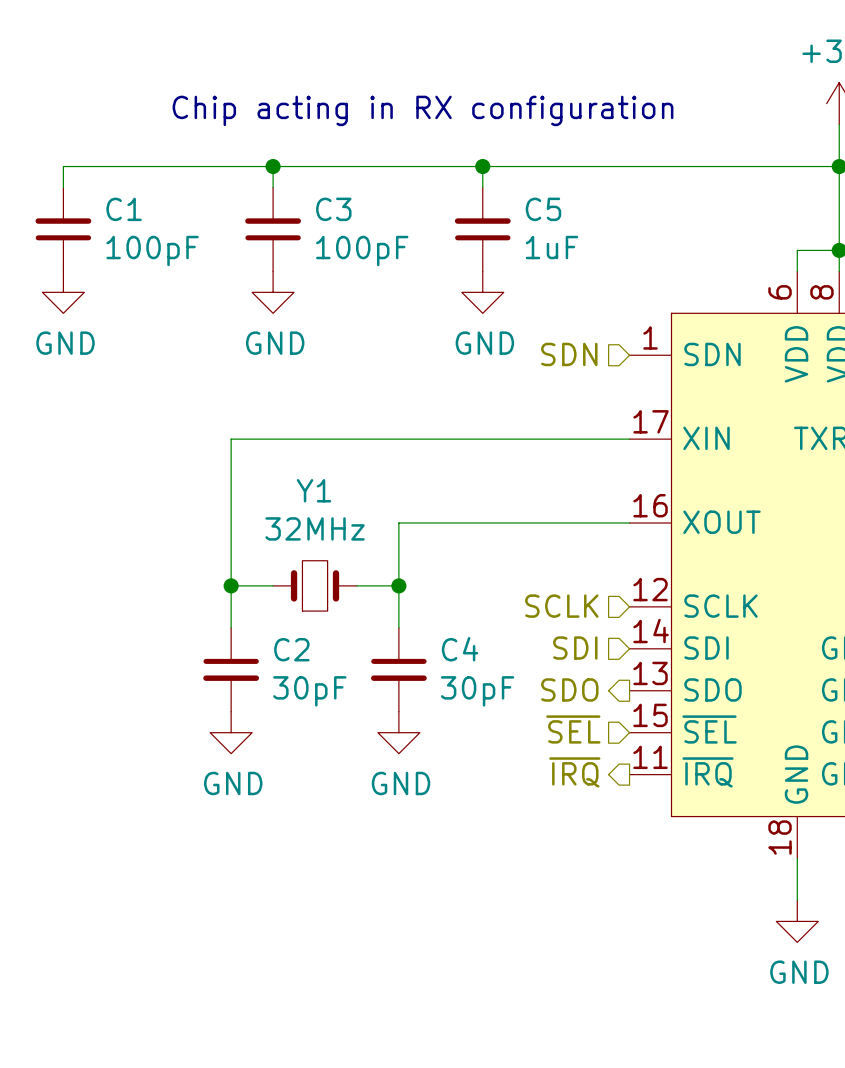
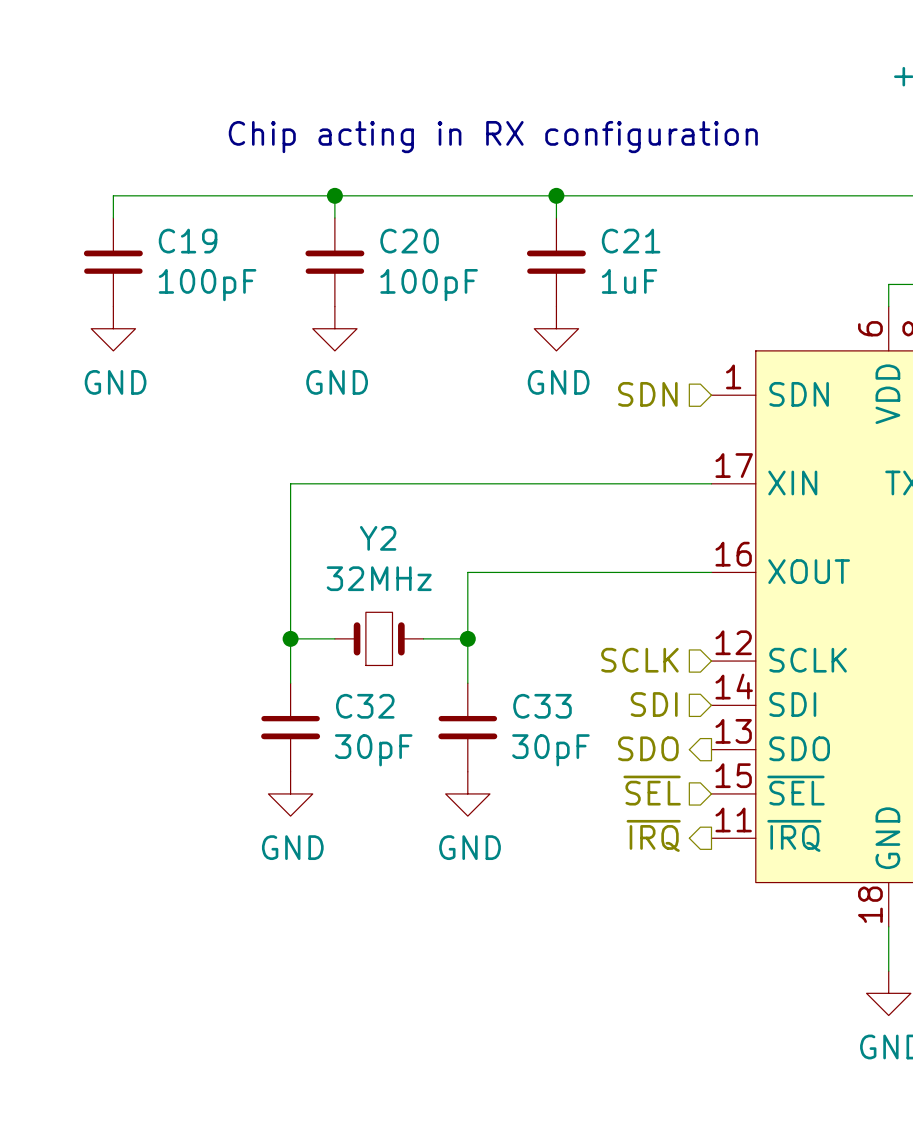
C1 name: C1 (124, 209) -> C19 (188, 241)
C3 name: C3 (333, 209) -> C20 (409, 241)
C5 name: C5 (543, 209) -> C21 (631, 241)
Y1 name: Y1 (314, 490) -> Y2 (378, 538)
C2 name: C2 (291, 649) -> C32 (365, 706)
C4 name: C4 (460, 649) -> C33 (542, 706)

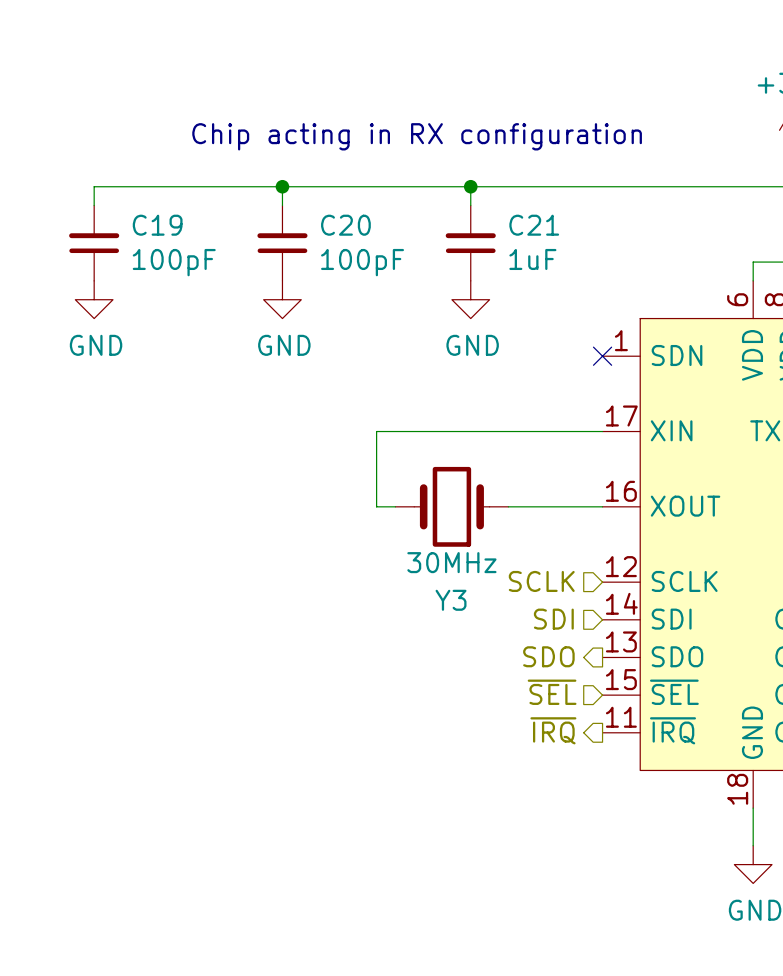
hierarchical label: SDN (647, 394) -> none
no-connect mark: none -> (602, 356)
wire: (445, 483) (290, 483) (290, 683) -> (376, 431) (376, 506) (395, 506)
Y3: none -> 30MHz (451, 506)
wire: (600, 572) (467, 572) (467, 683) -> none
wire: (290, 638) (334, 638) -> none
junction: (290, 638) -> none
Y2: 32MHz (379, 638) -> none
wire: (423, 638) (467, 638) -> none
junction: (467, 638) -> none
C32: 30pF (290, 727) -> none
C33: 30pF (467, 727) -> none
power symbol: GND (290, 793) -> none
power symbol: GND (467, 793) -> none

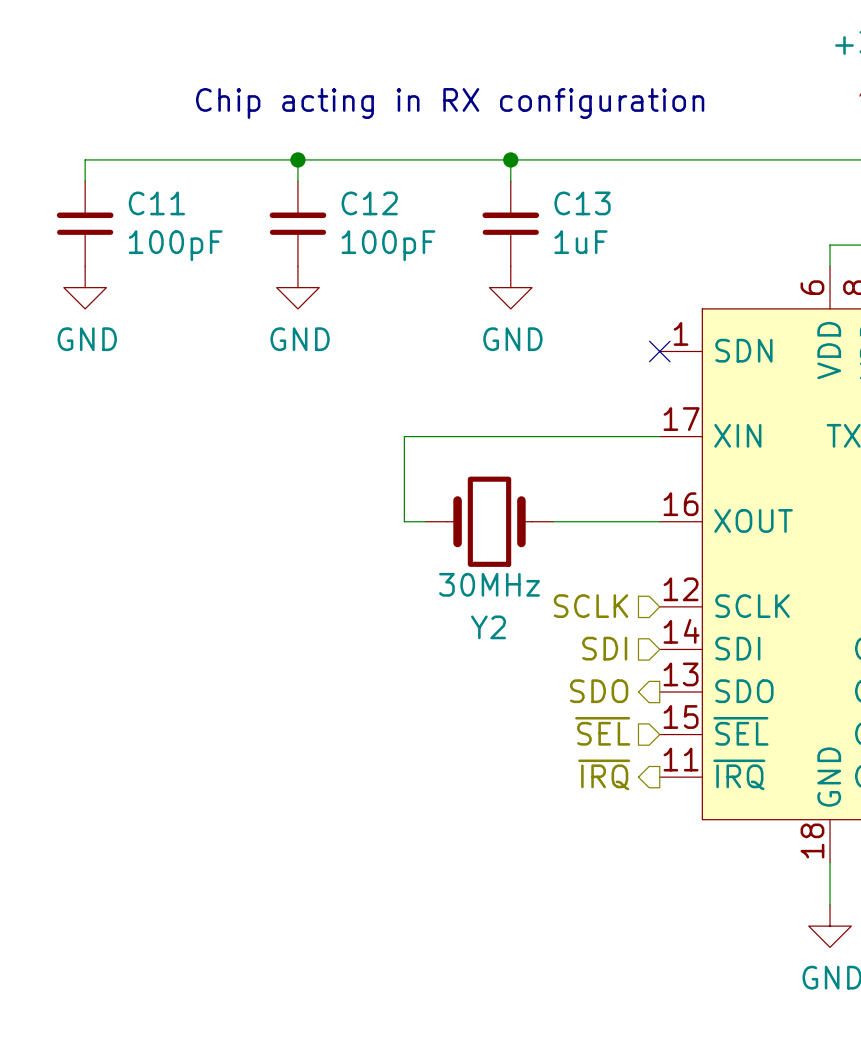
C19 name: C19 (157, 225) -> C11 (156, 203)
C20 name: C20 (345, 225) -> C12 (369, 203)
C21 name: C21 (534, 225) -> C13 (582, 203)
Y3 name: Y3 (451, 600) -> Y2 (488, 627)

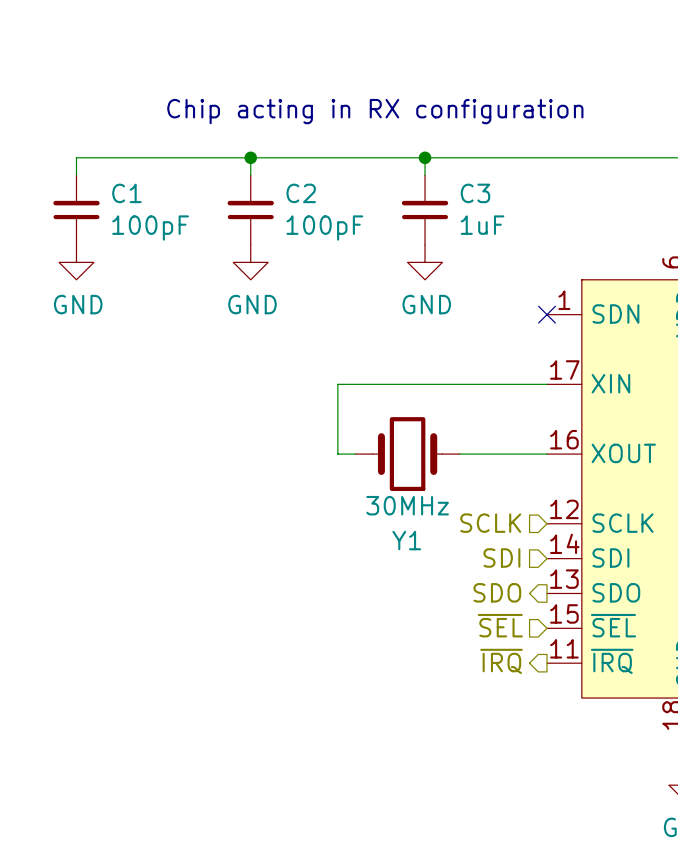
C11 name: C11 (156, 203) -> C1 (126, 193)
C12 name: C12 (369, 203) -> C2 (301, 193)
C13 name: C13 (582, 203) -> C3 (475, 193)
Y2 name: Y2 (488, 627) -> Y1 (406, 540)

